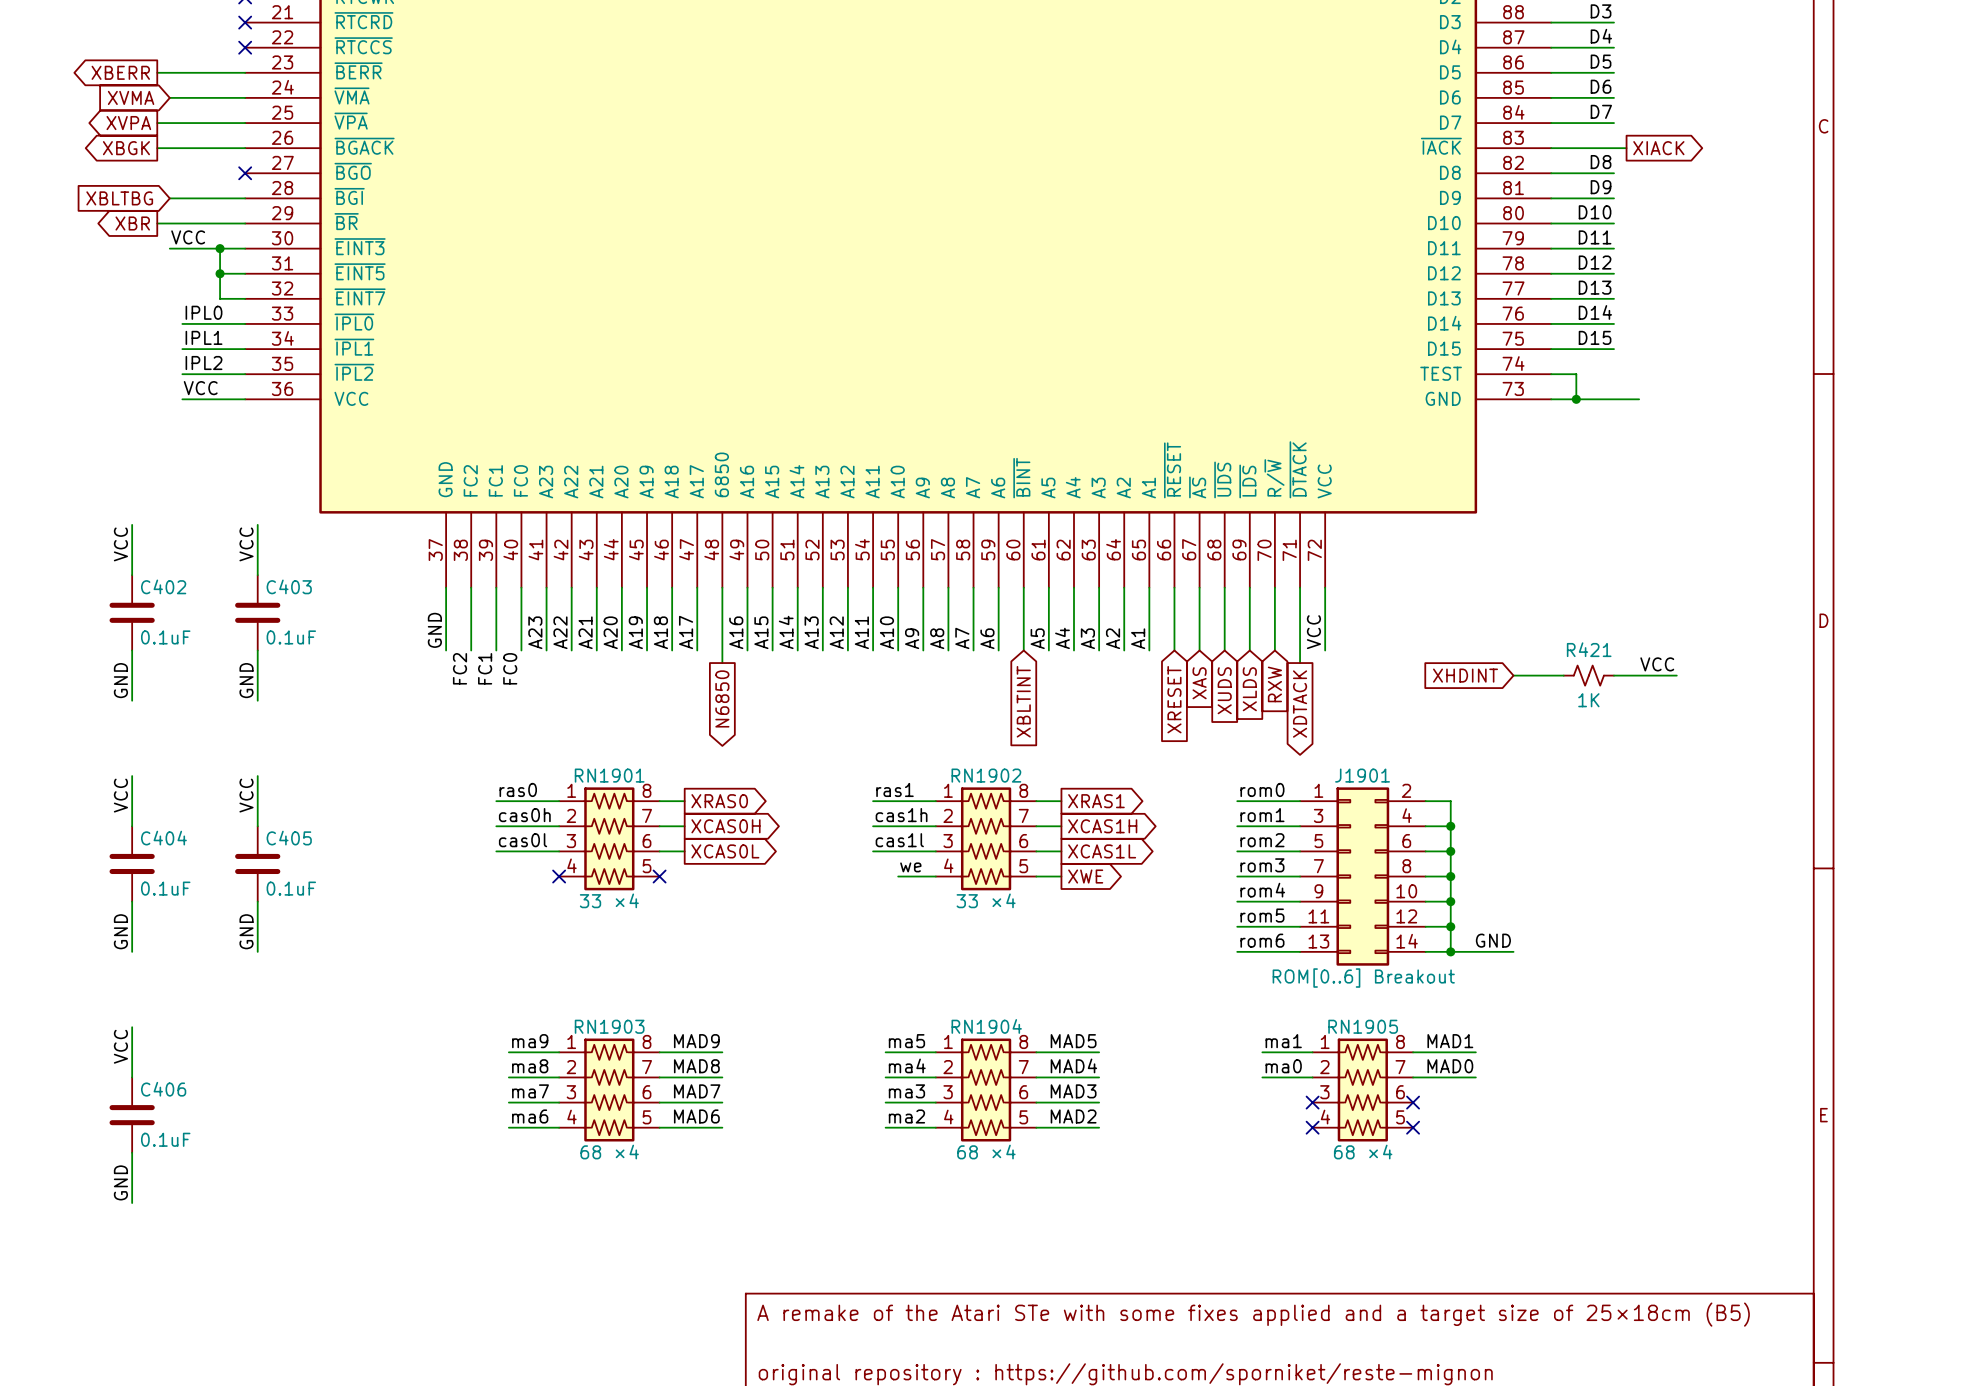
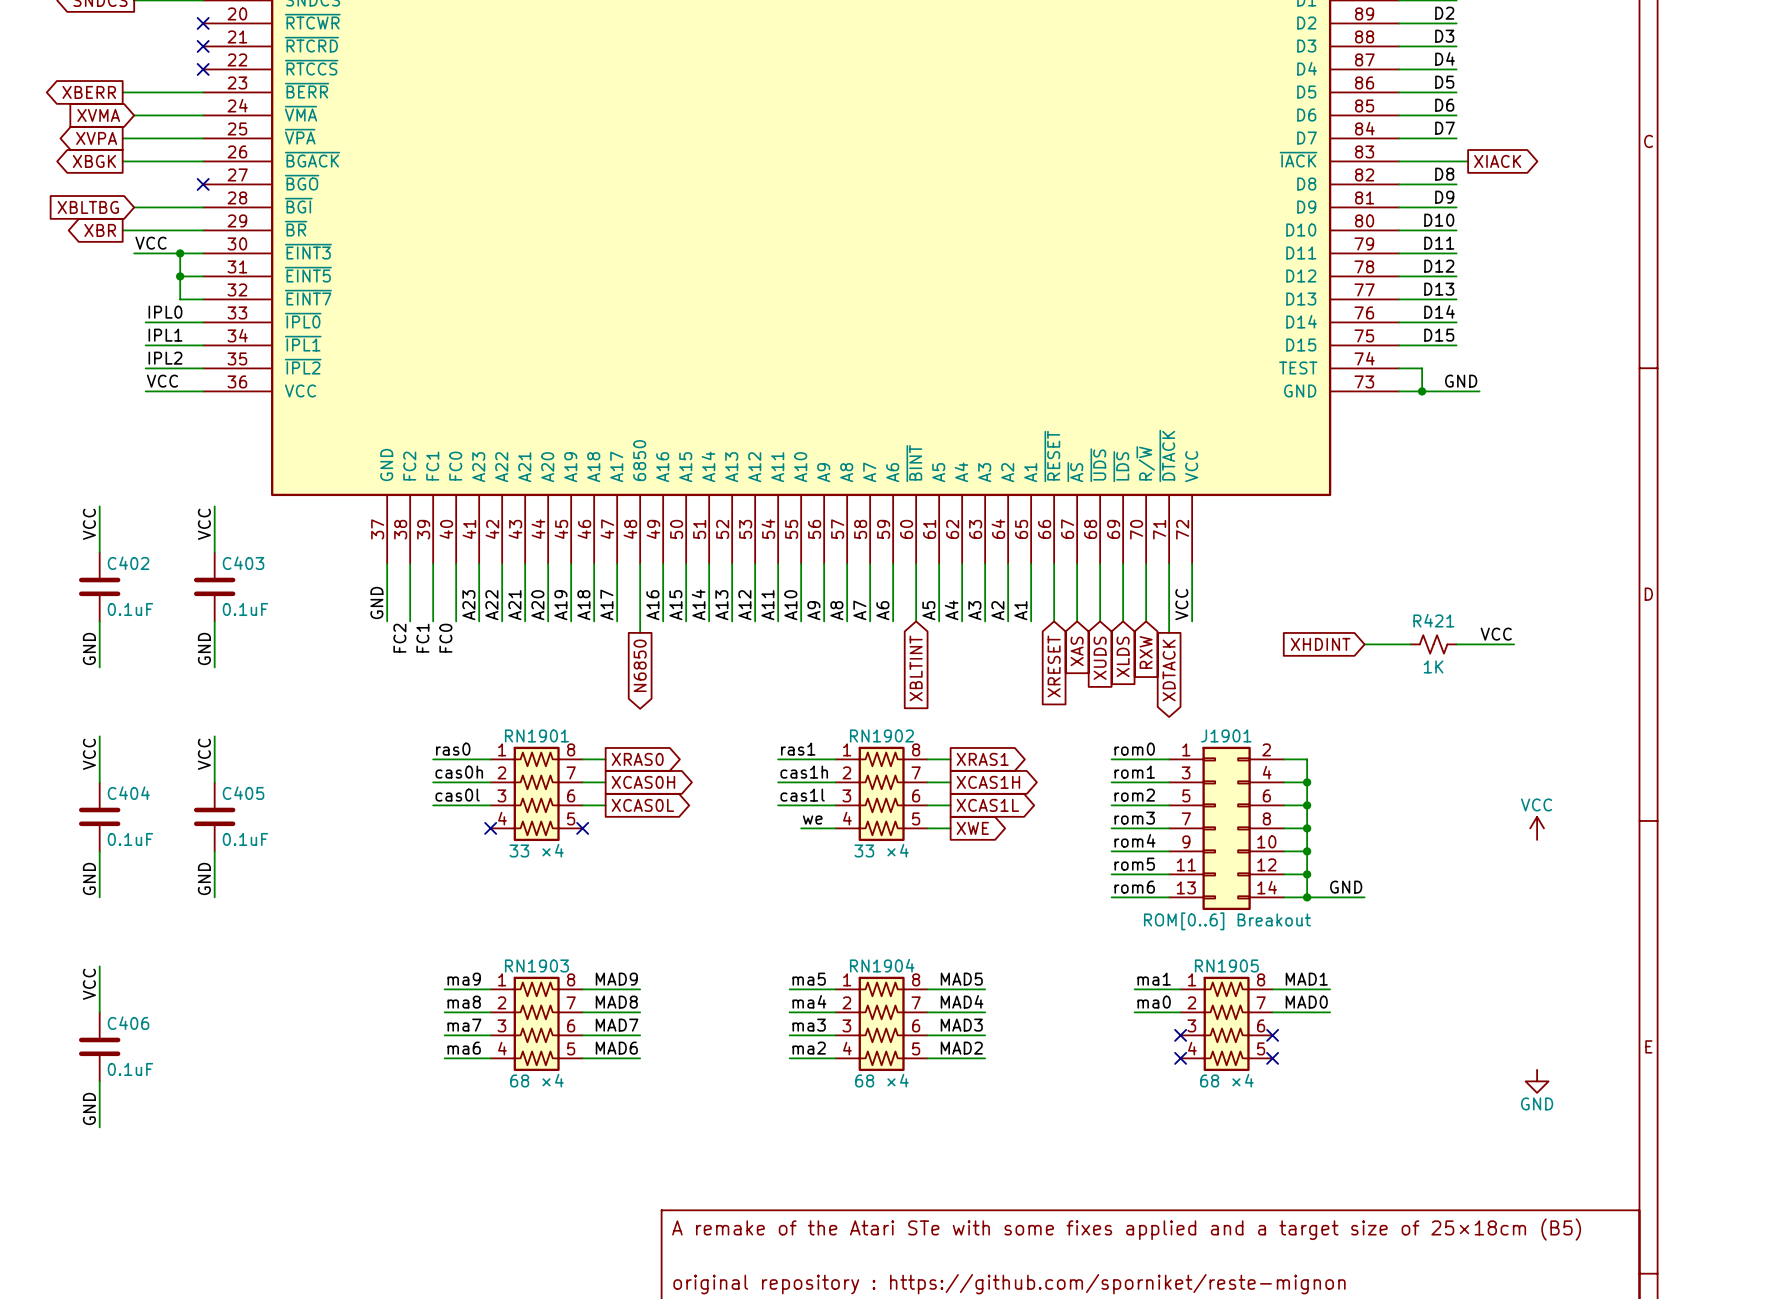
label: none -> GND (1461, 381)
power symbol: none -> VCC (1537, 828)
power symbol: none -> GND (1537, 1081)

